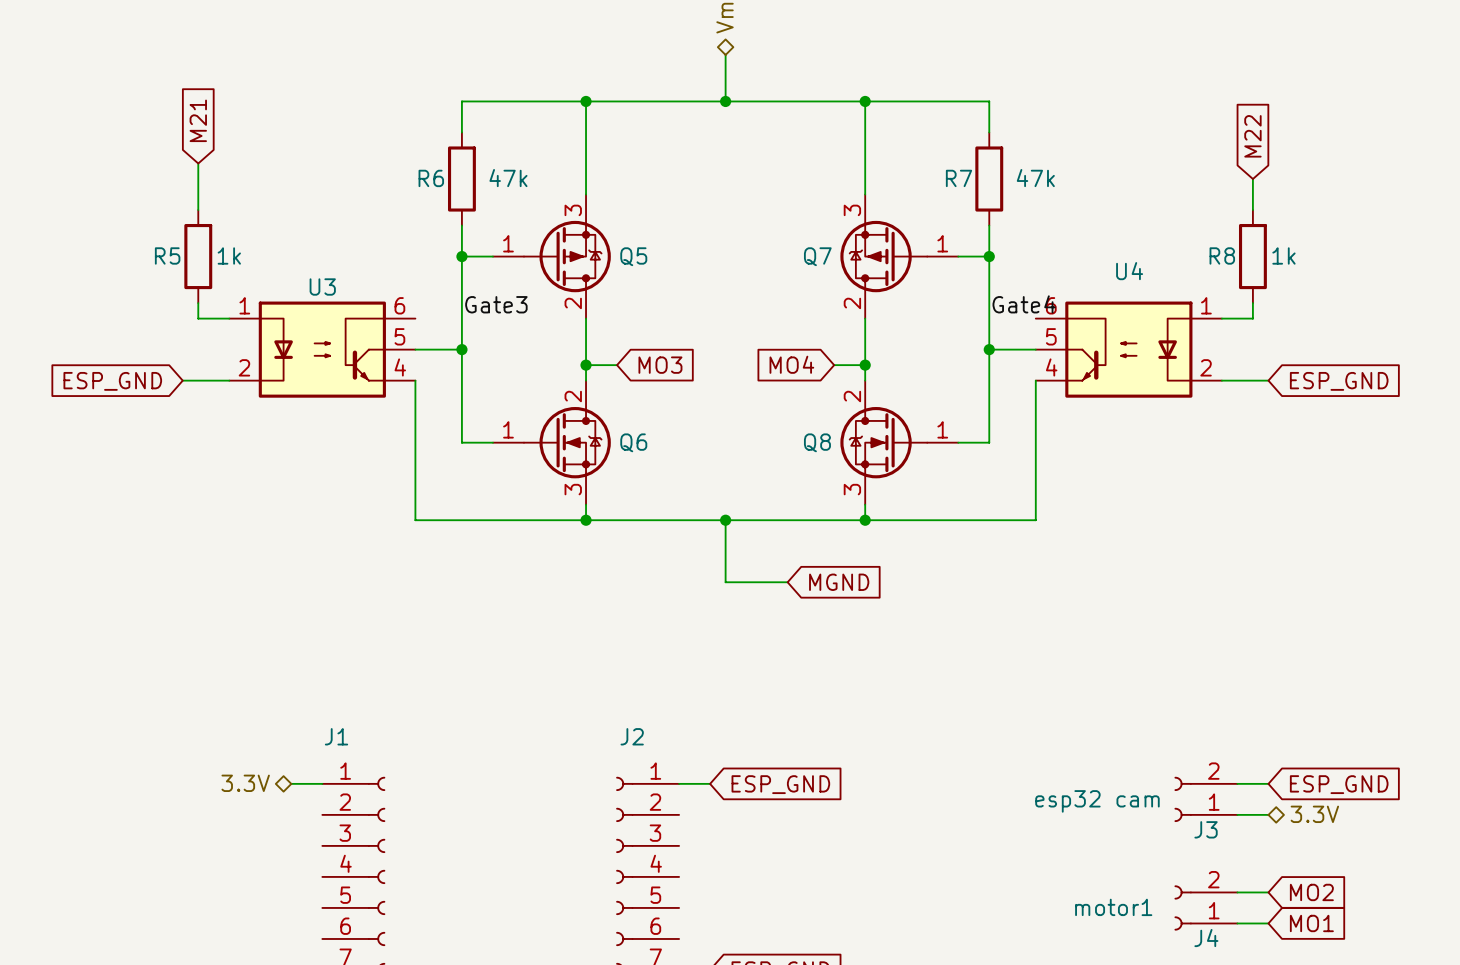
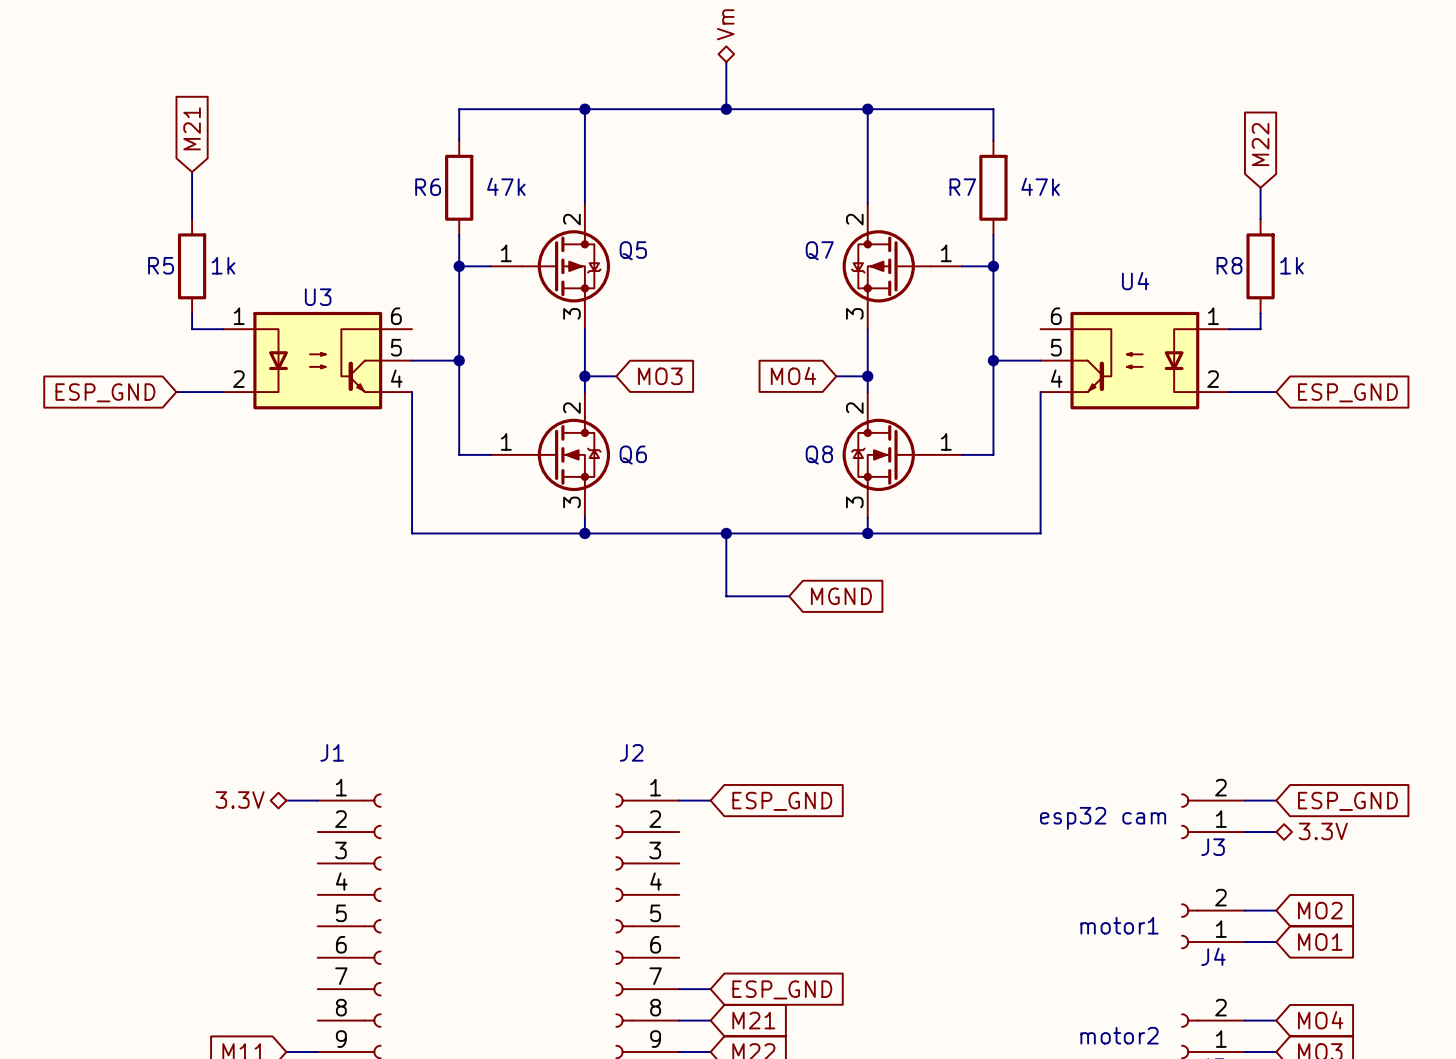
Q5 flip: as is (567, 256) -> up-down (566, 266)
Q7 flip: as is (883, 256) -> up-down (886, 266)
label: Gate3 (496, 304) -> none
label: Gate4 (1024, 304) -> none

